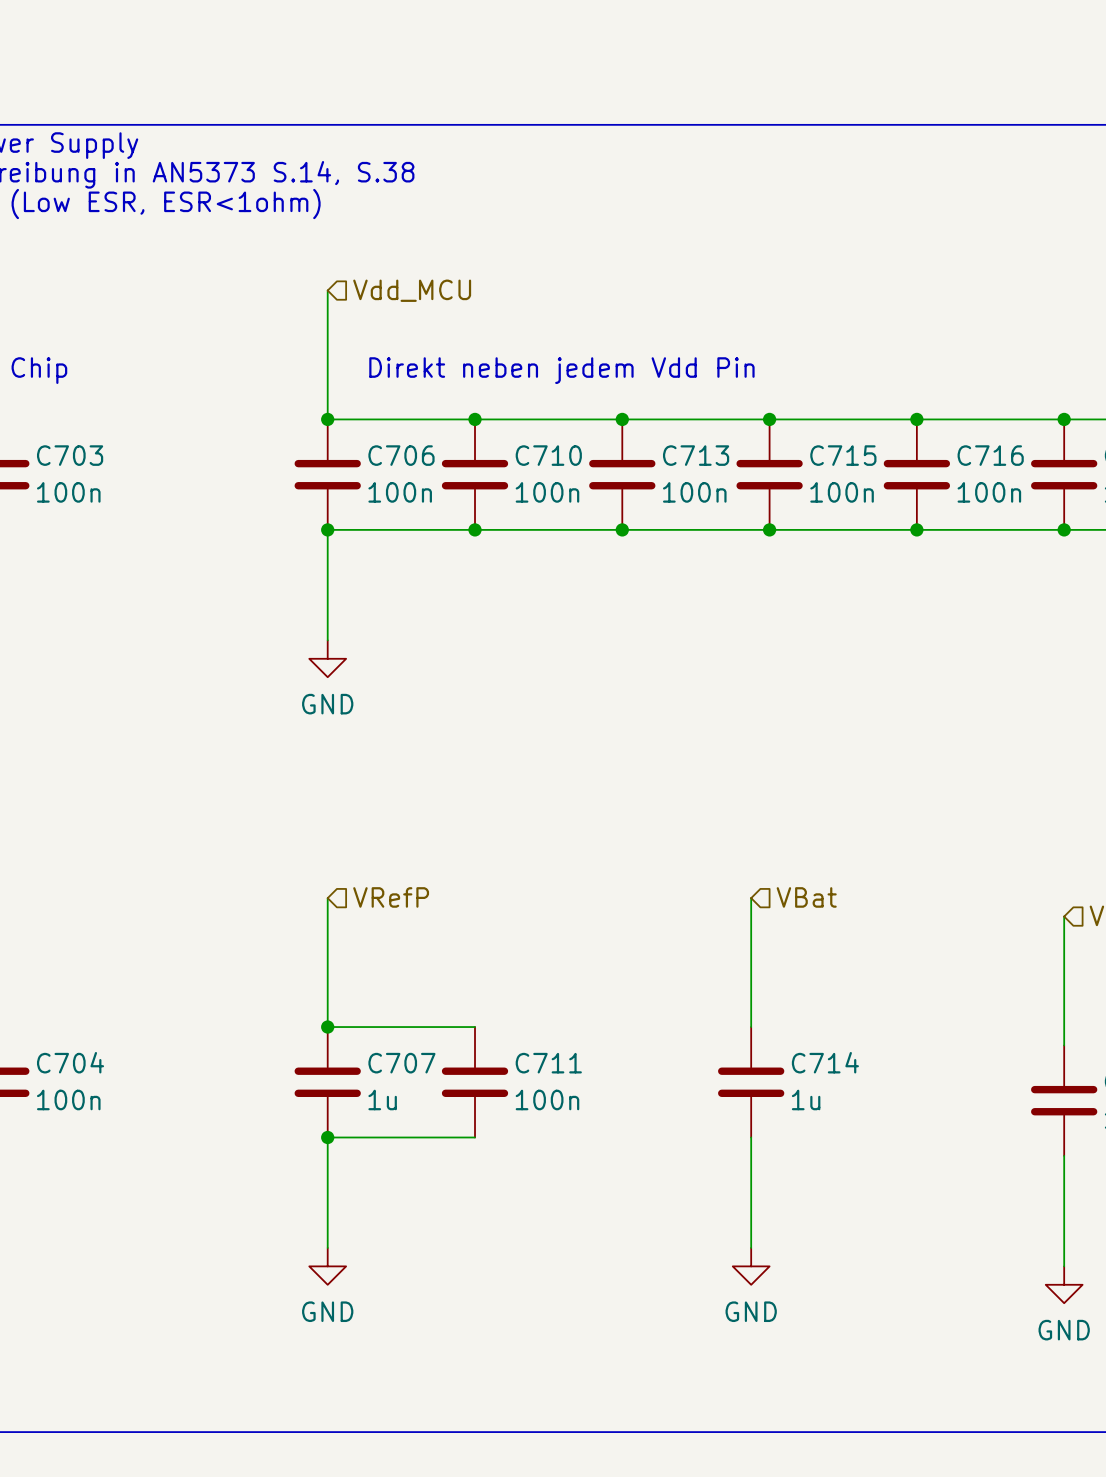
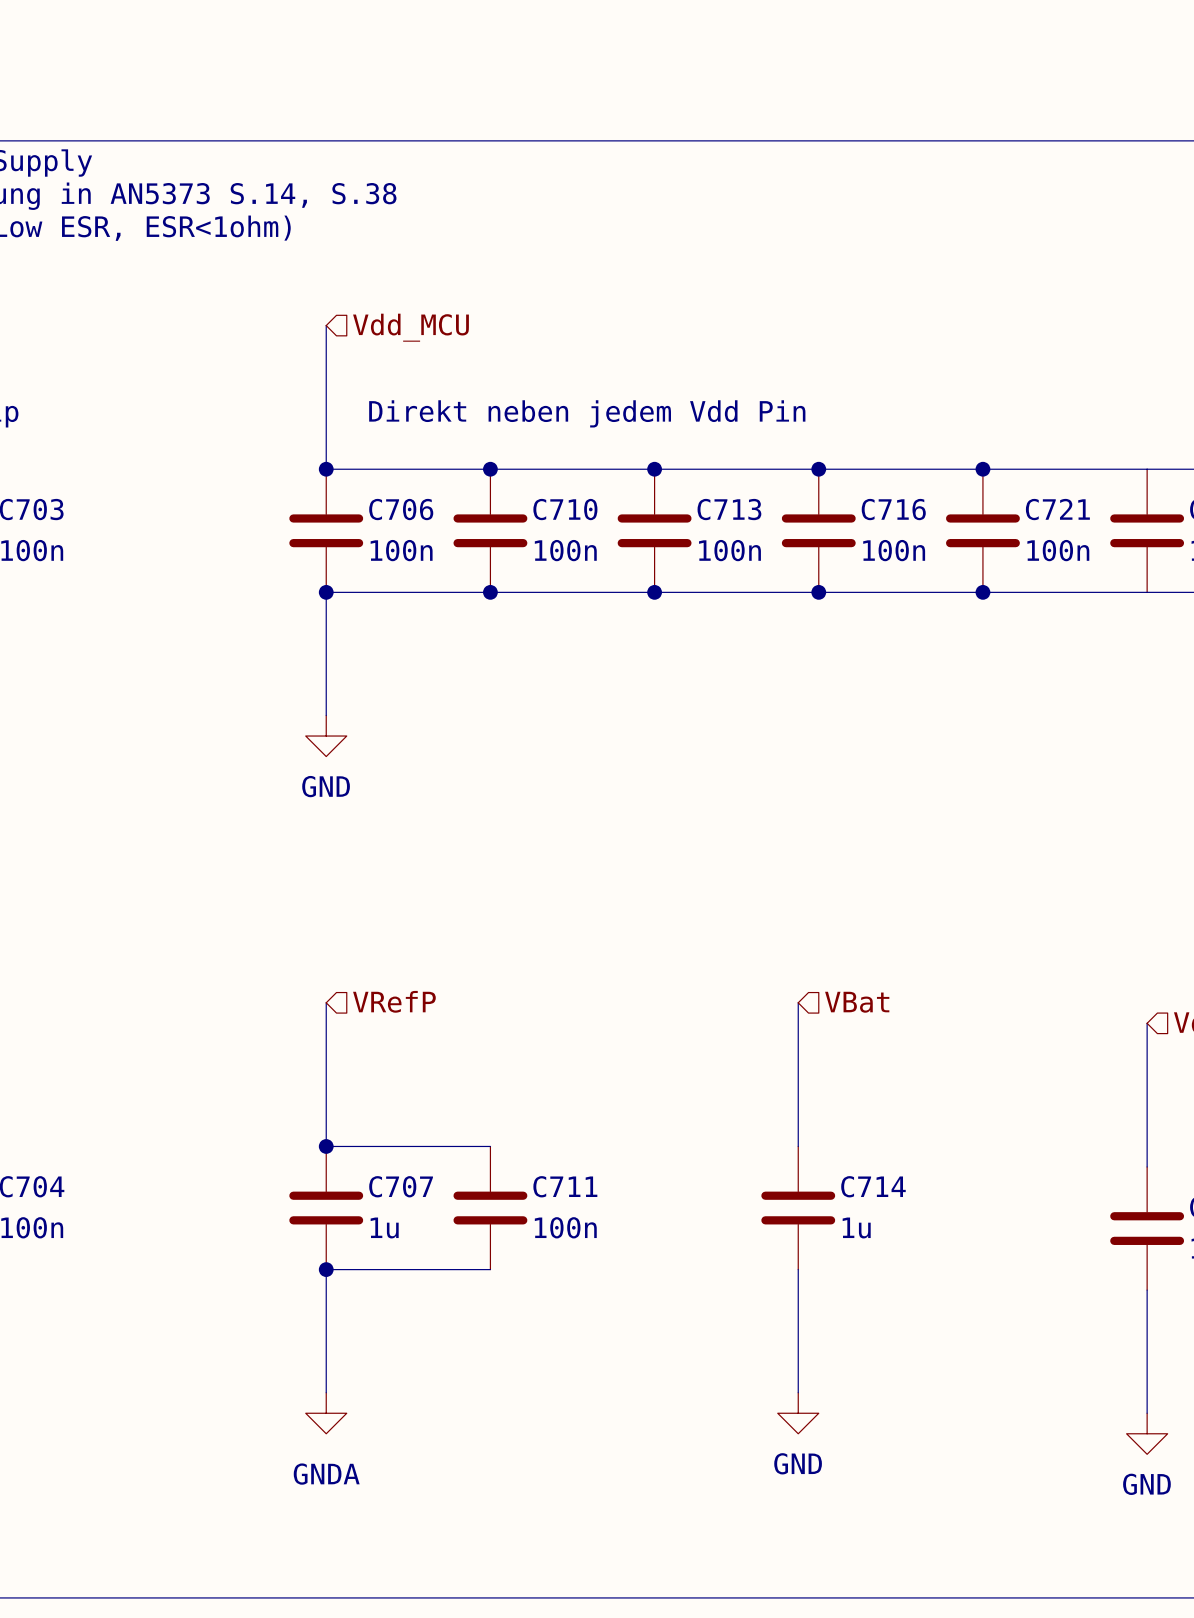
junction: (1064, 419) -> none
C715 name: C715 (843, 455) -> C716 (893, 509)
C716 name: C716 (990, 455) -> C721 (1057, 509)
junction: (1064, 529) -> none
power symbol: GND (327, 1266) -> GNDA (326, 1413)

